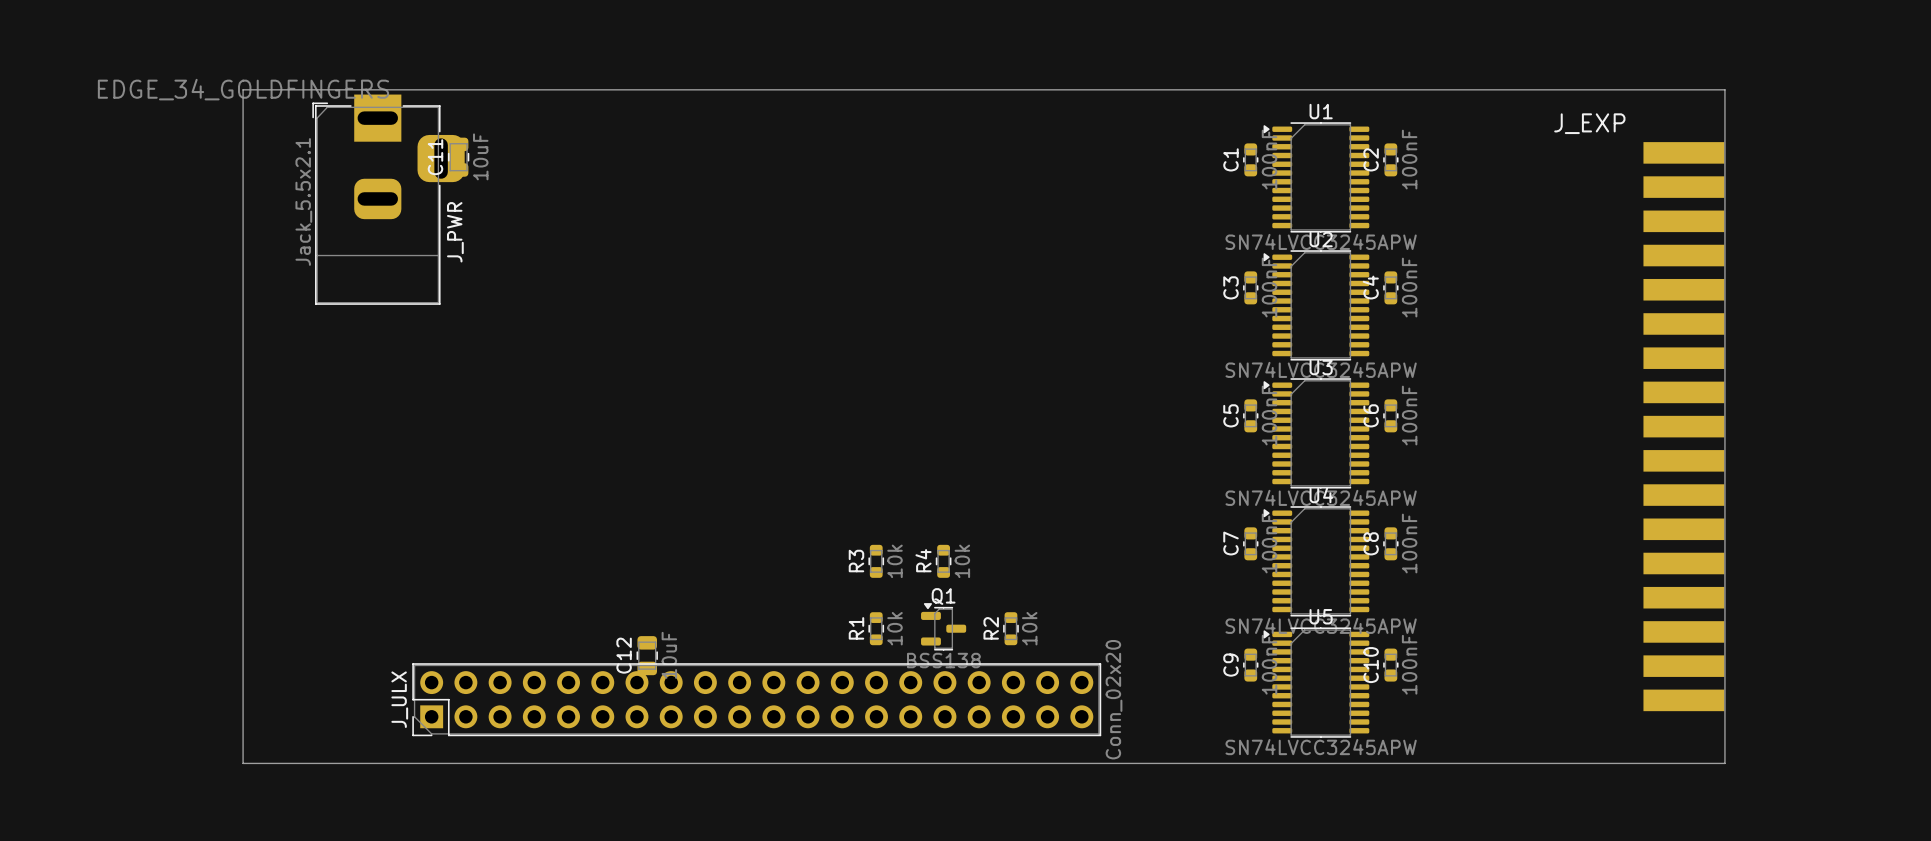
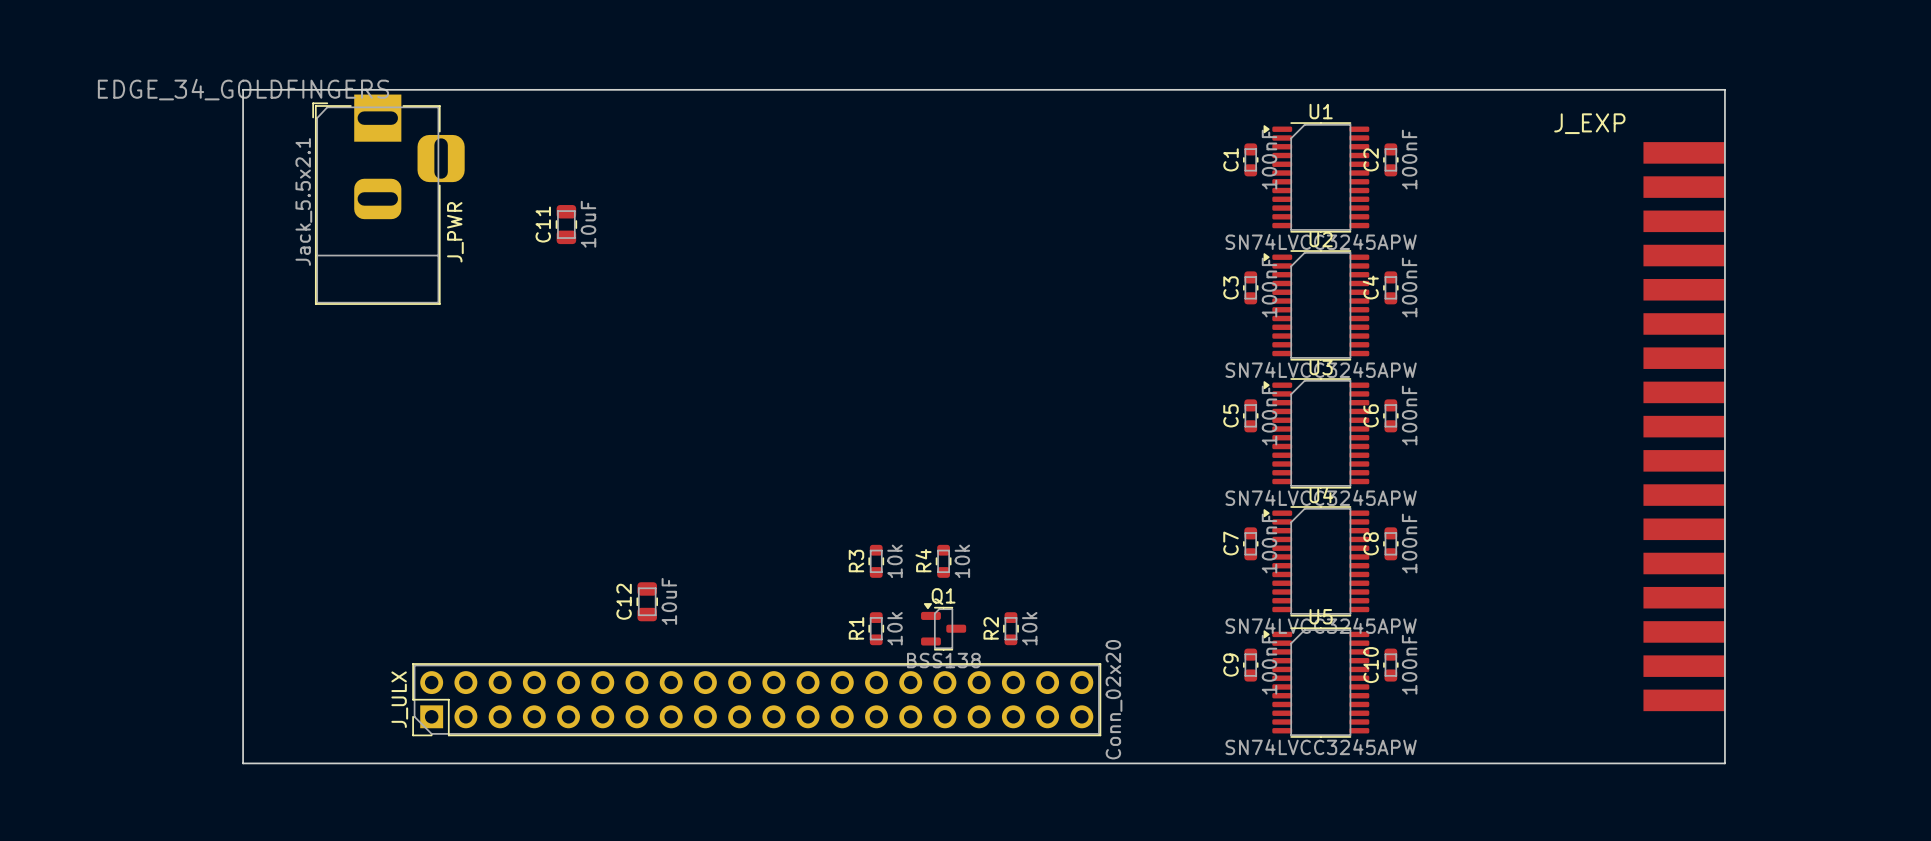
C11 position: (458, 157) -> (566, 224)
C12 position: (647, 655) -> (647, 601)

